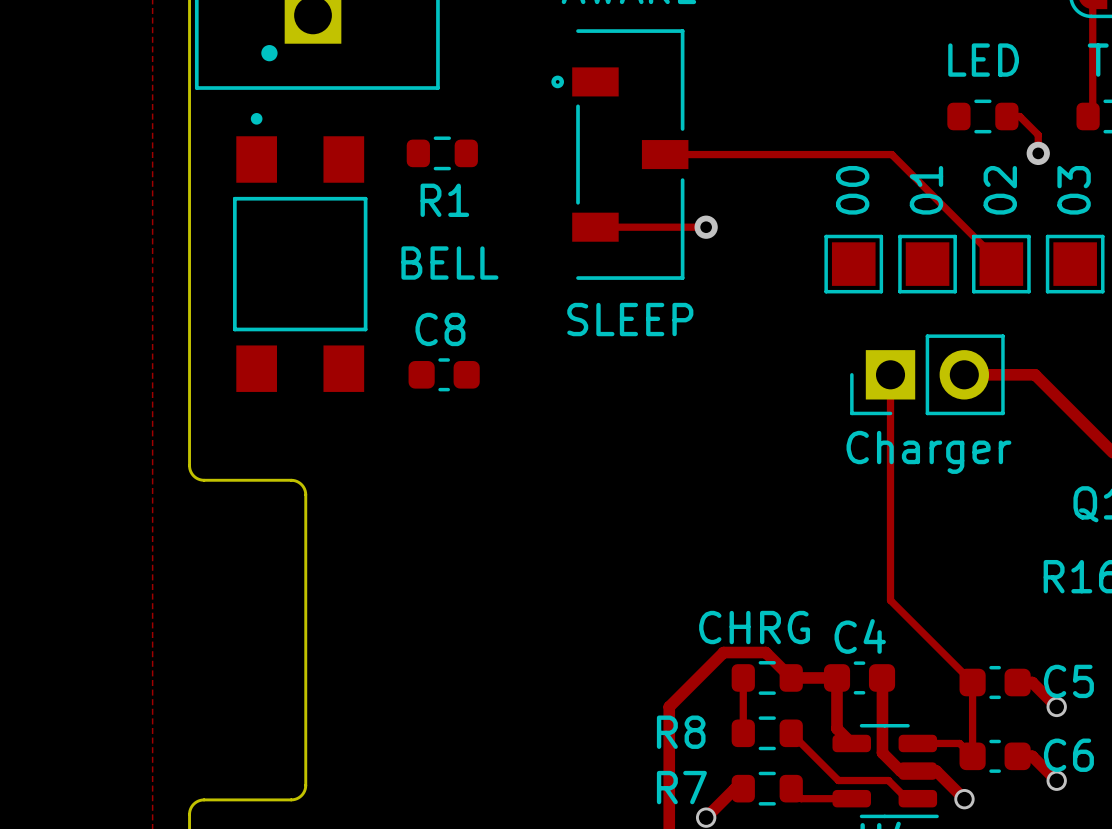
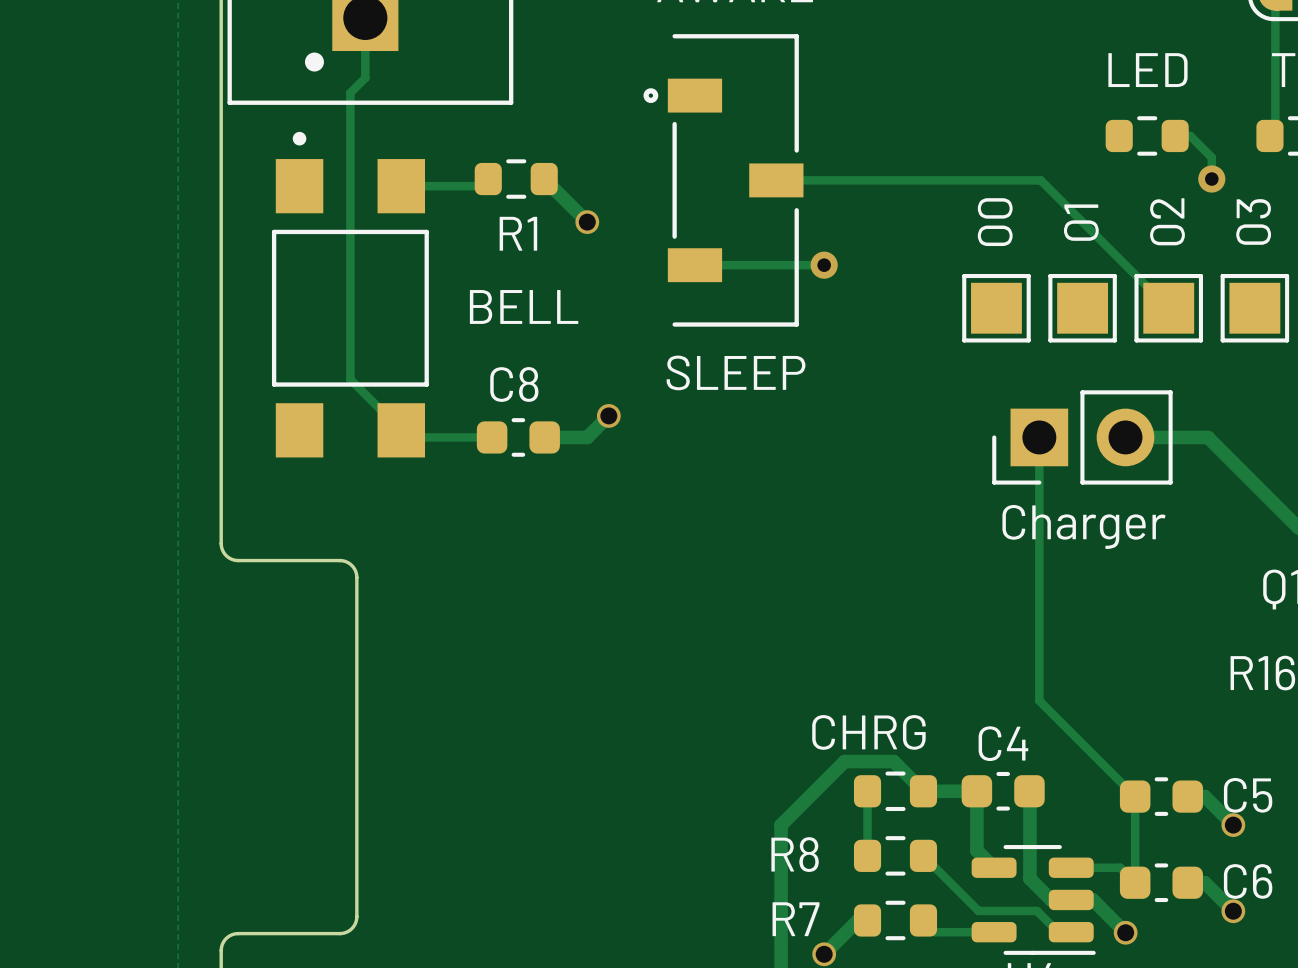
track: none -> (365, 17) (365, 77) (350, 92) (350, 379) (408, 437) (492, 437)
track: none -> (488, 179) (481, 186) (401, 186)
track: none -> (544, 179) (587, 222)
via: none -> (587, 222)
track: none -> (608, 415) (587, 437) (544, 437)
via: none -> (608, 415)

